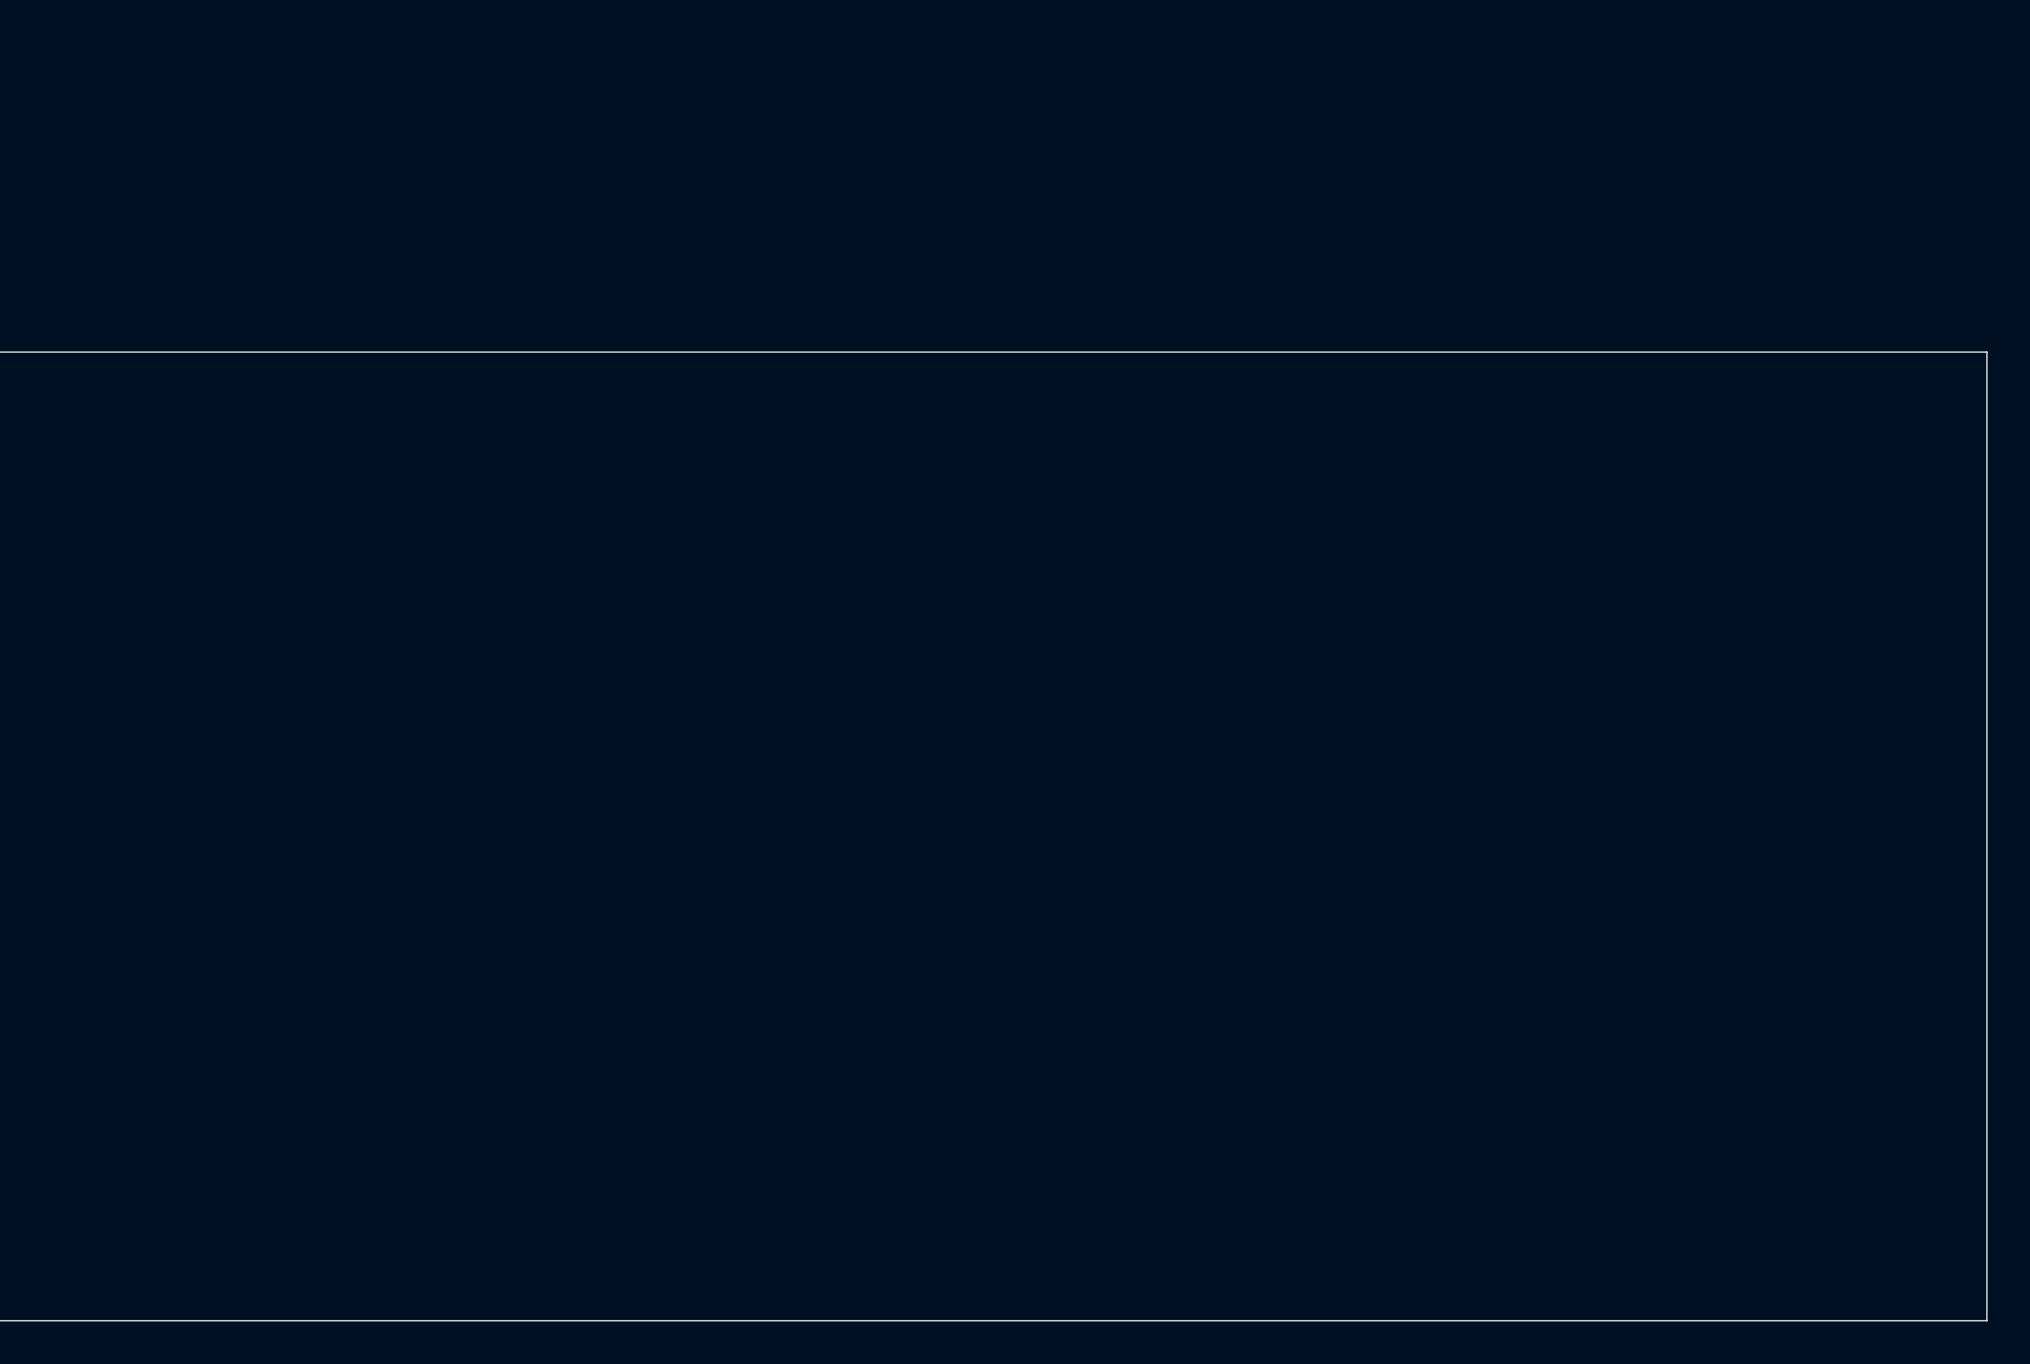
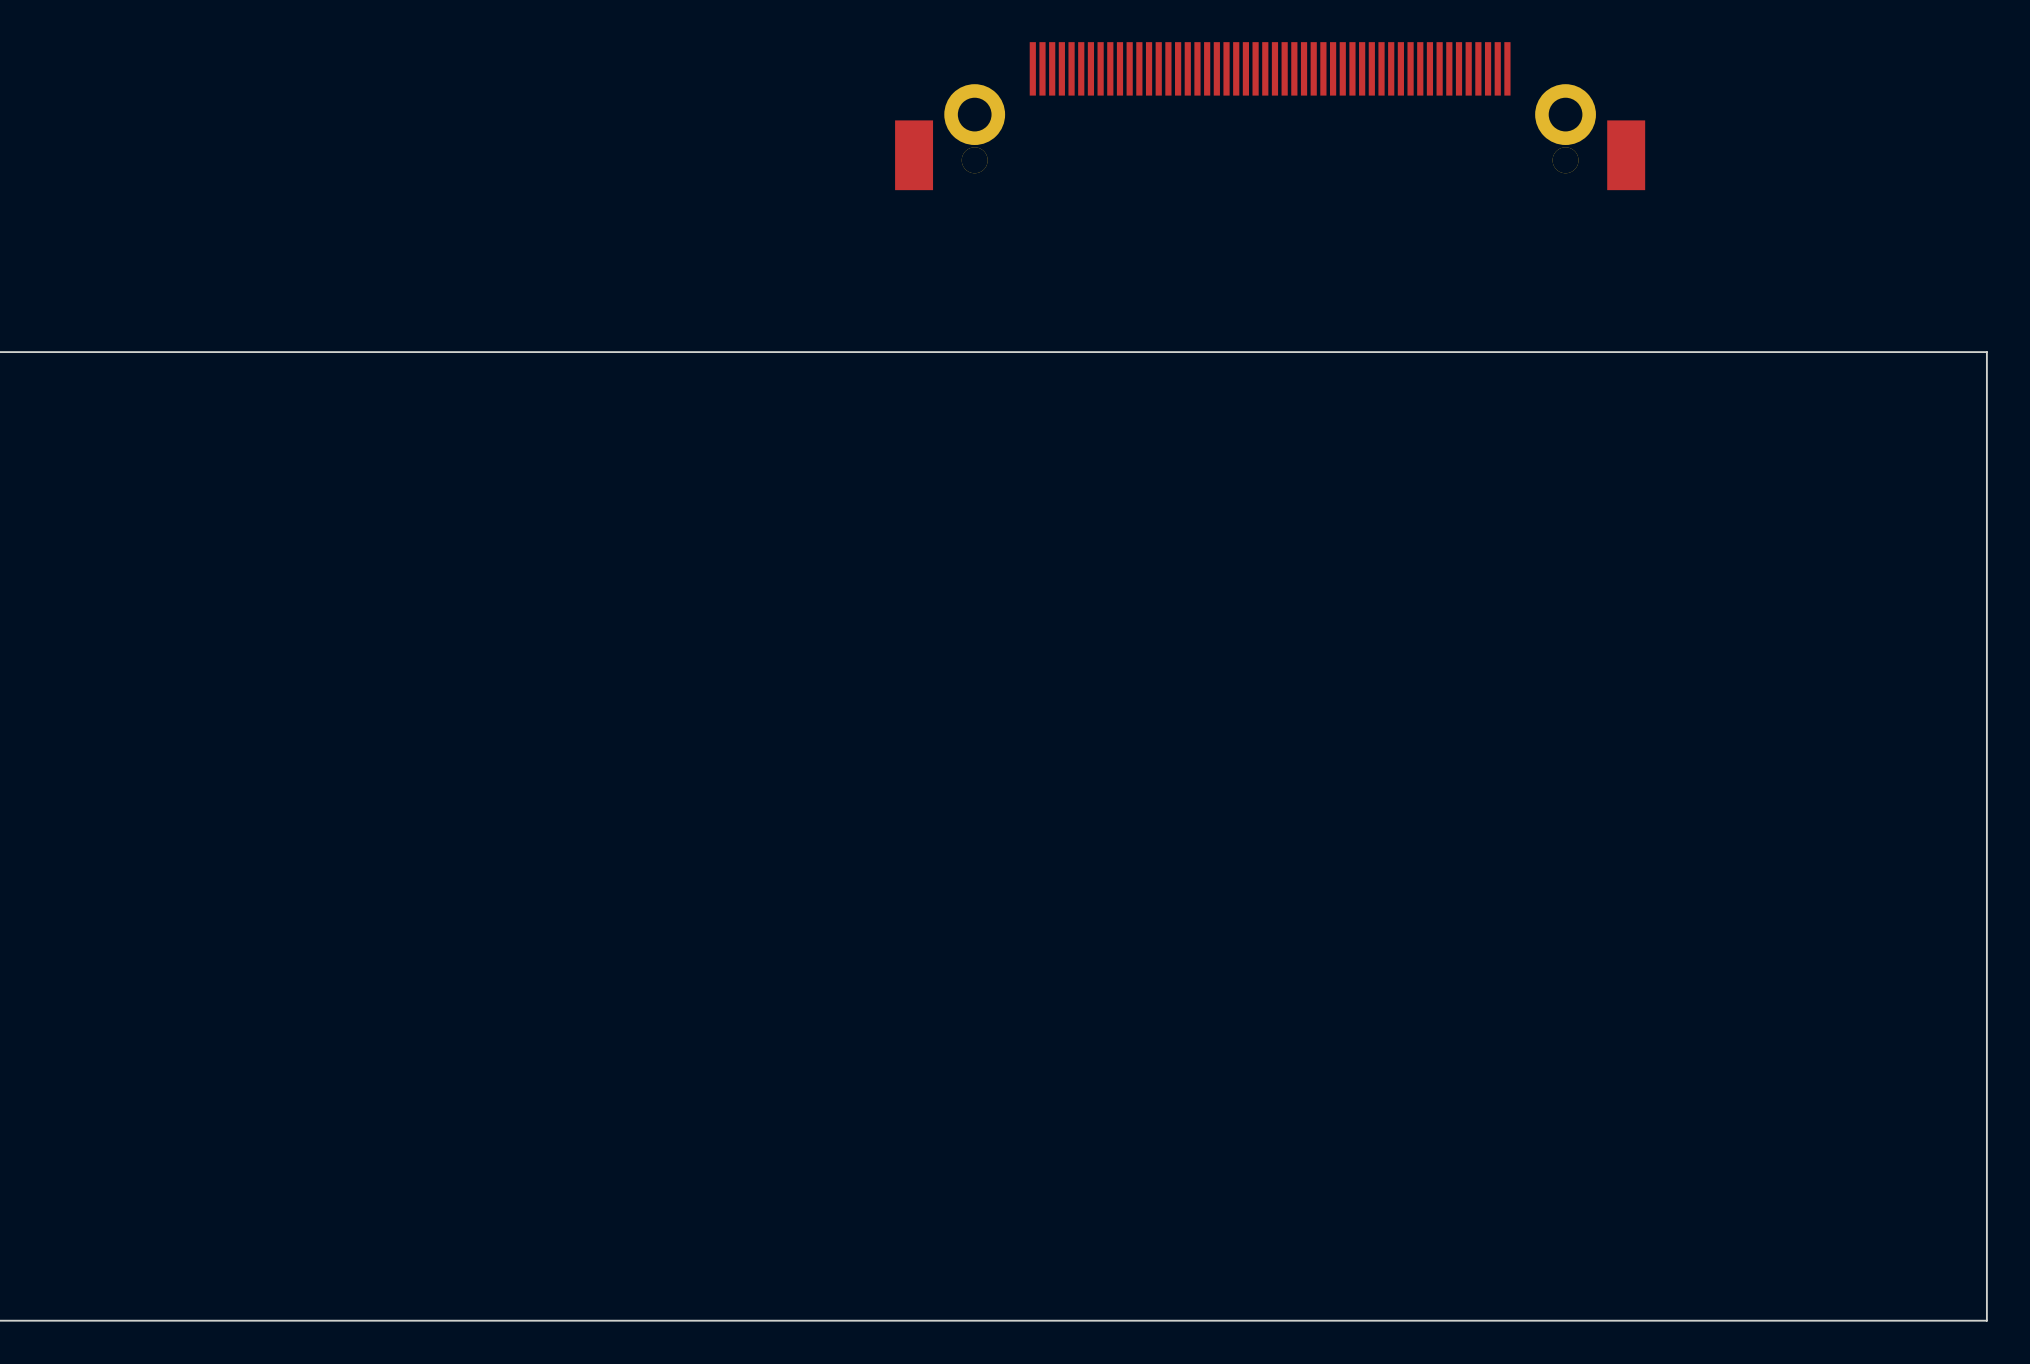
part: none -> (1270, 116)

